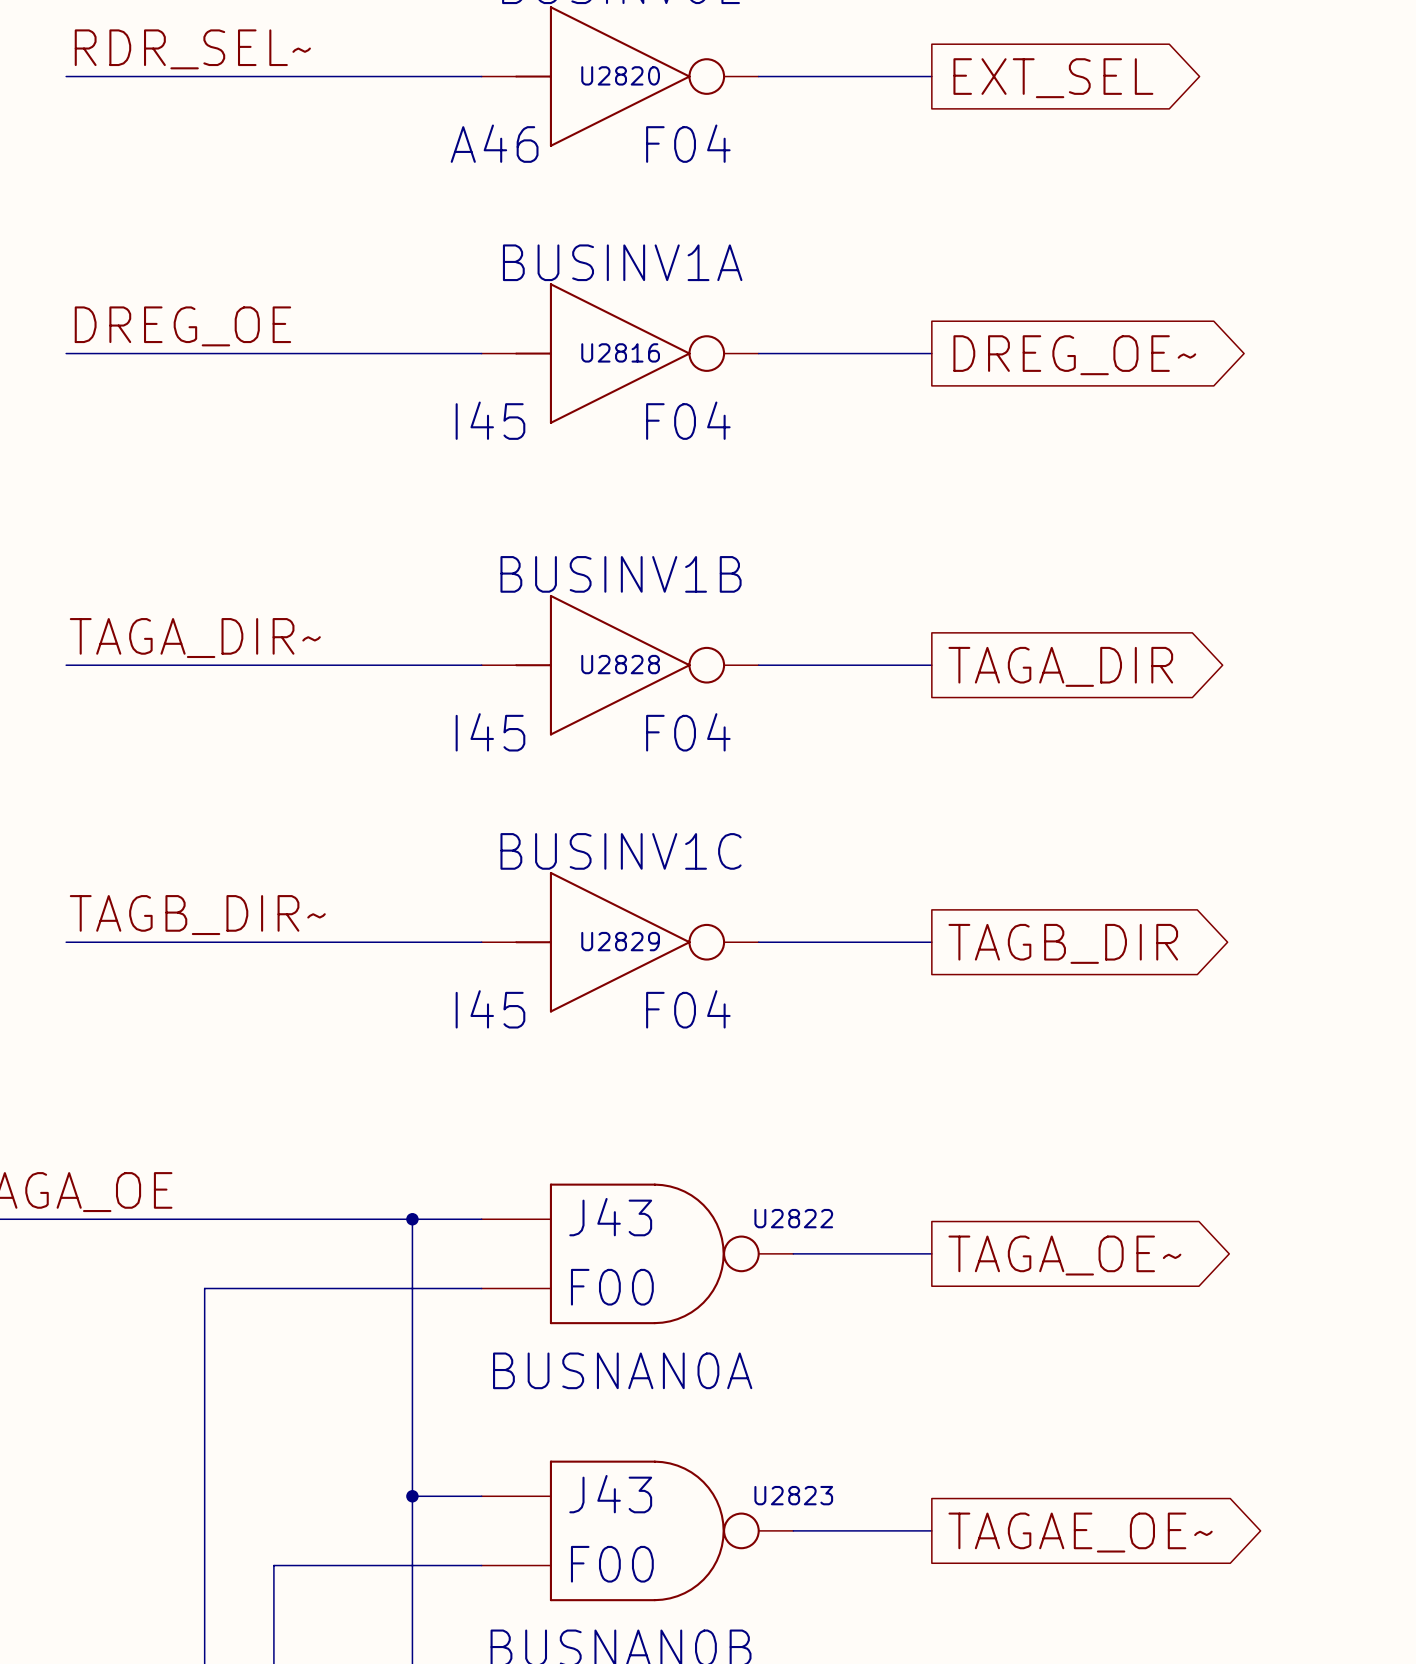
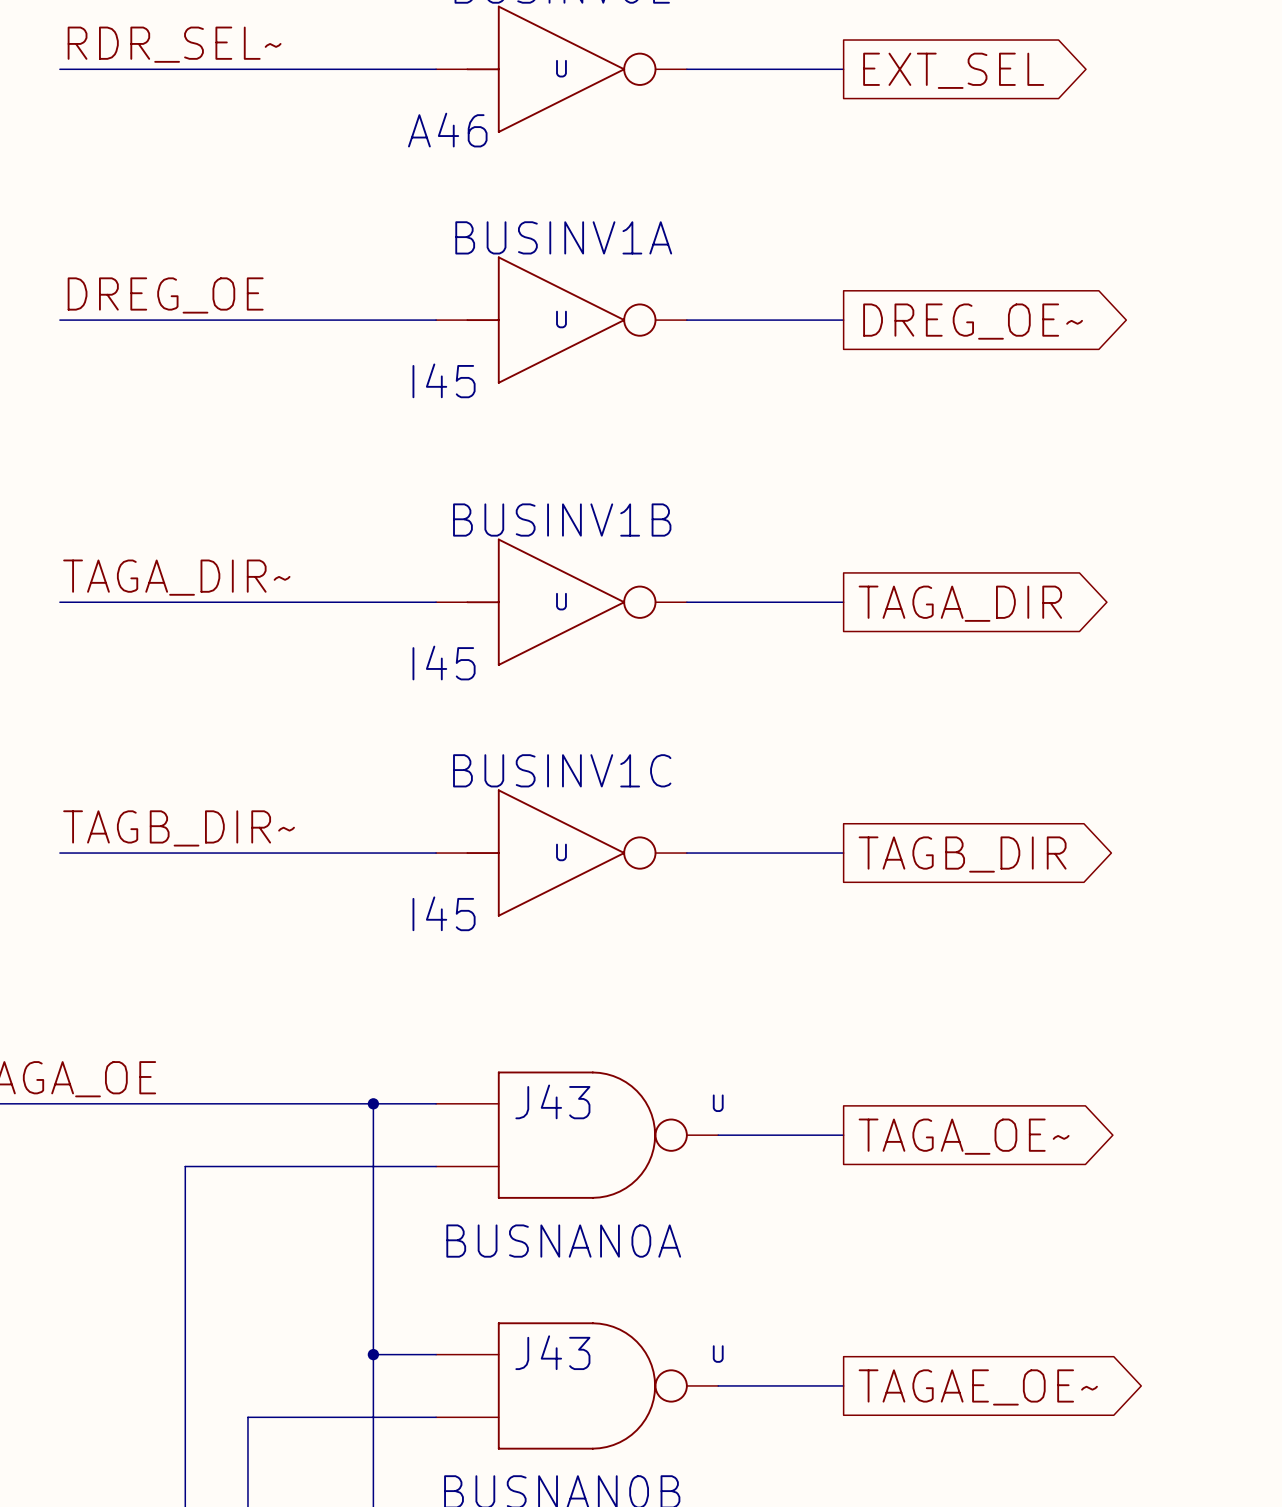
U2820 name: U2820 (620, 75) -> U (561, 68)
U2820 value: F04 (688, 143) -> none
U2816 name: U2816 (620, 352) -> U (561, 319)
U2816 value: F04 (688, 420) -> none
U2828 name: U2828 (620, 664) -> U (561, 601)
U2828 value: F04 (688, 732) -> none
U2829 name: U2829 (620, 941) -> U (561, 852)
U2829 value: F04 (688, 1009) -> none
U2822 name: U2822 (793, 1218) -> U (718, 1103)
U2822 value: F00 (612, 1287) -> none
U2823 name: U2823 (793, 1495) -> U (718, 1354)
U2823 value: F00 (612, 1564) -> none

